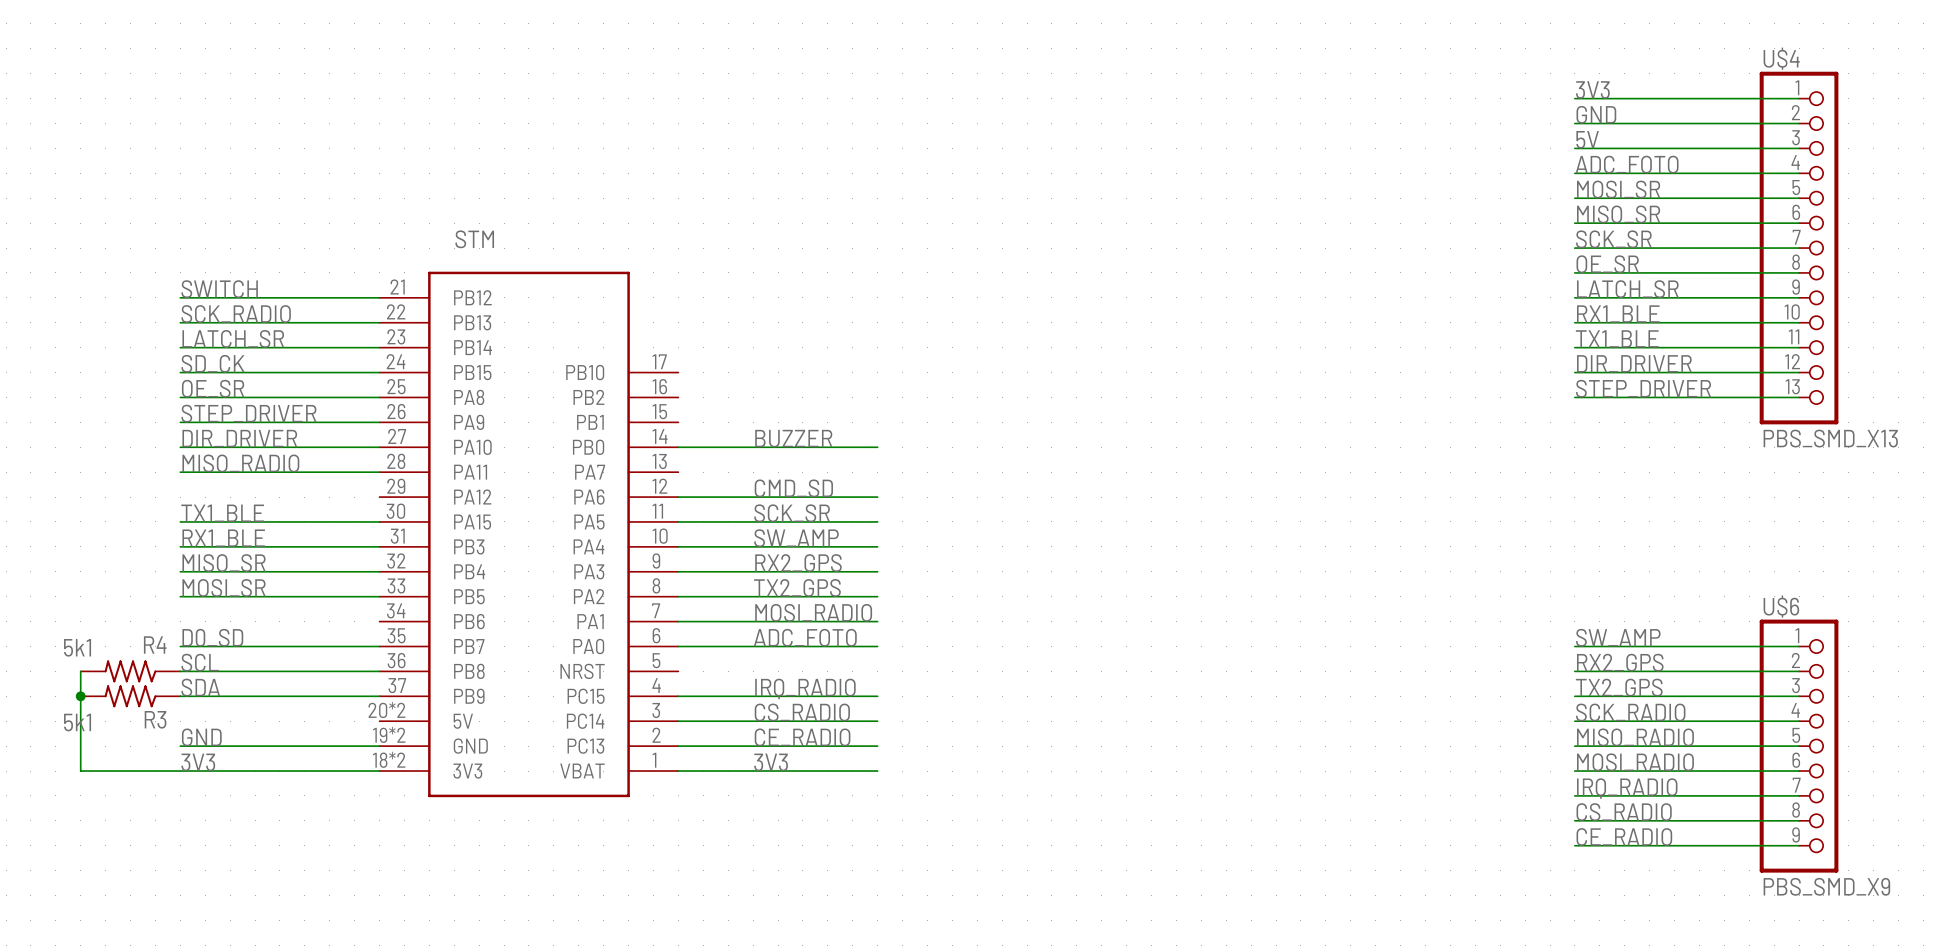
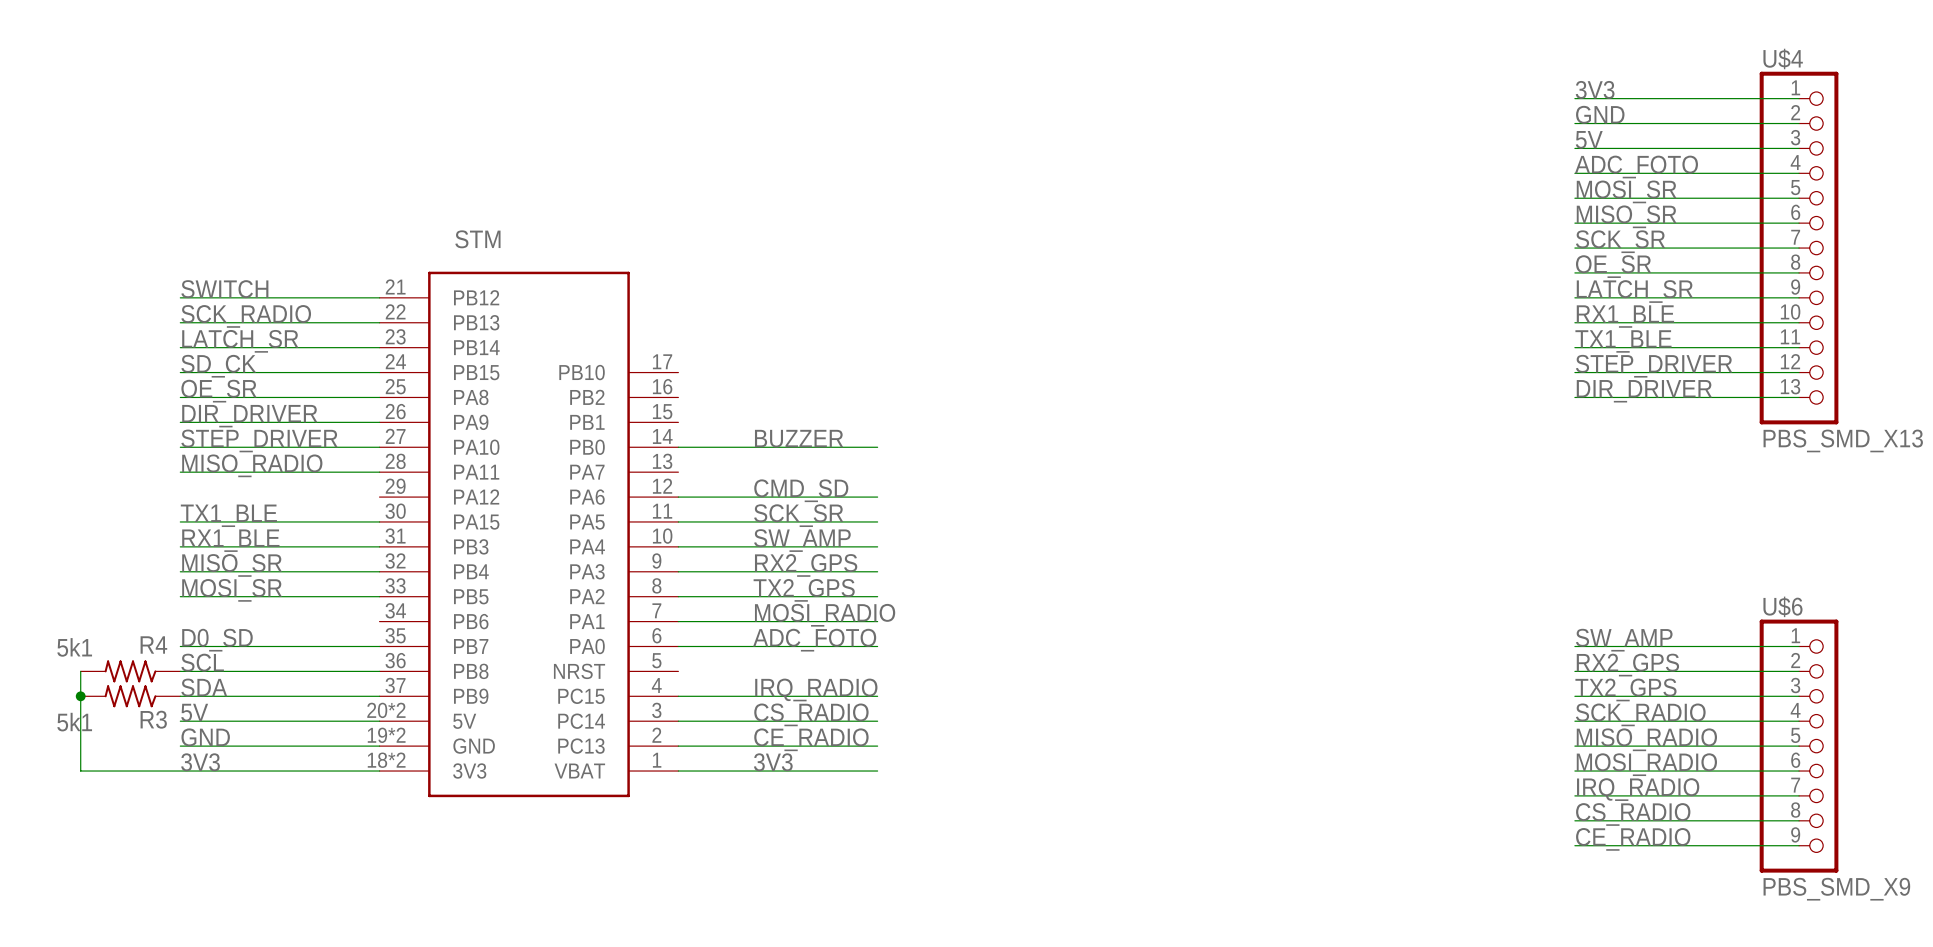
label: DIR_DRIVER (1634, 363) -> STEP_DRIVER (1654, 366)
label: STEP_DRIVER (1643, 388) -> DIR_DRIVER (1644, 391)
label: STEP_DRIVER (249, 413) -> DIR_DRIVER (249, 416)
label: DIR_DRIVER (239, 438) -> STEP_DRIVER (259, 440)
label: none -> 5V (194, 712)
wire: none -> (180, 721) (379, 721)

